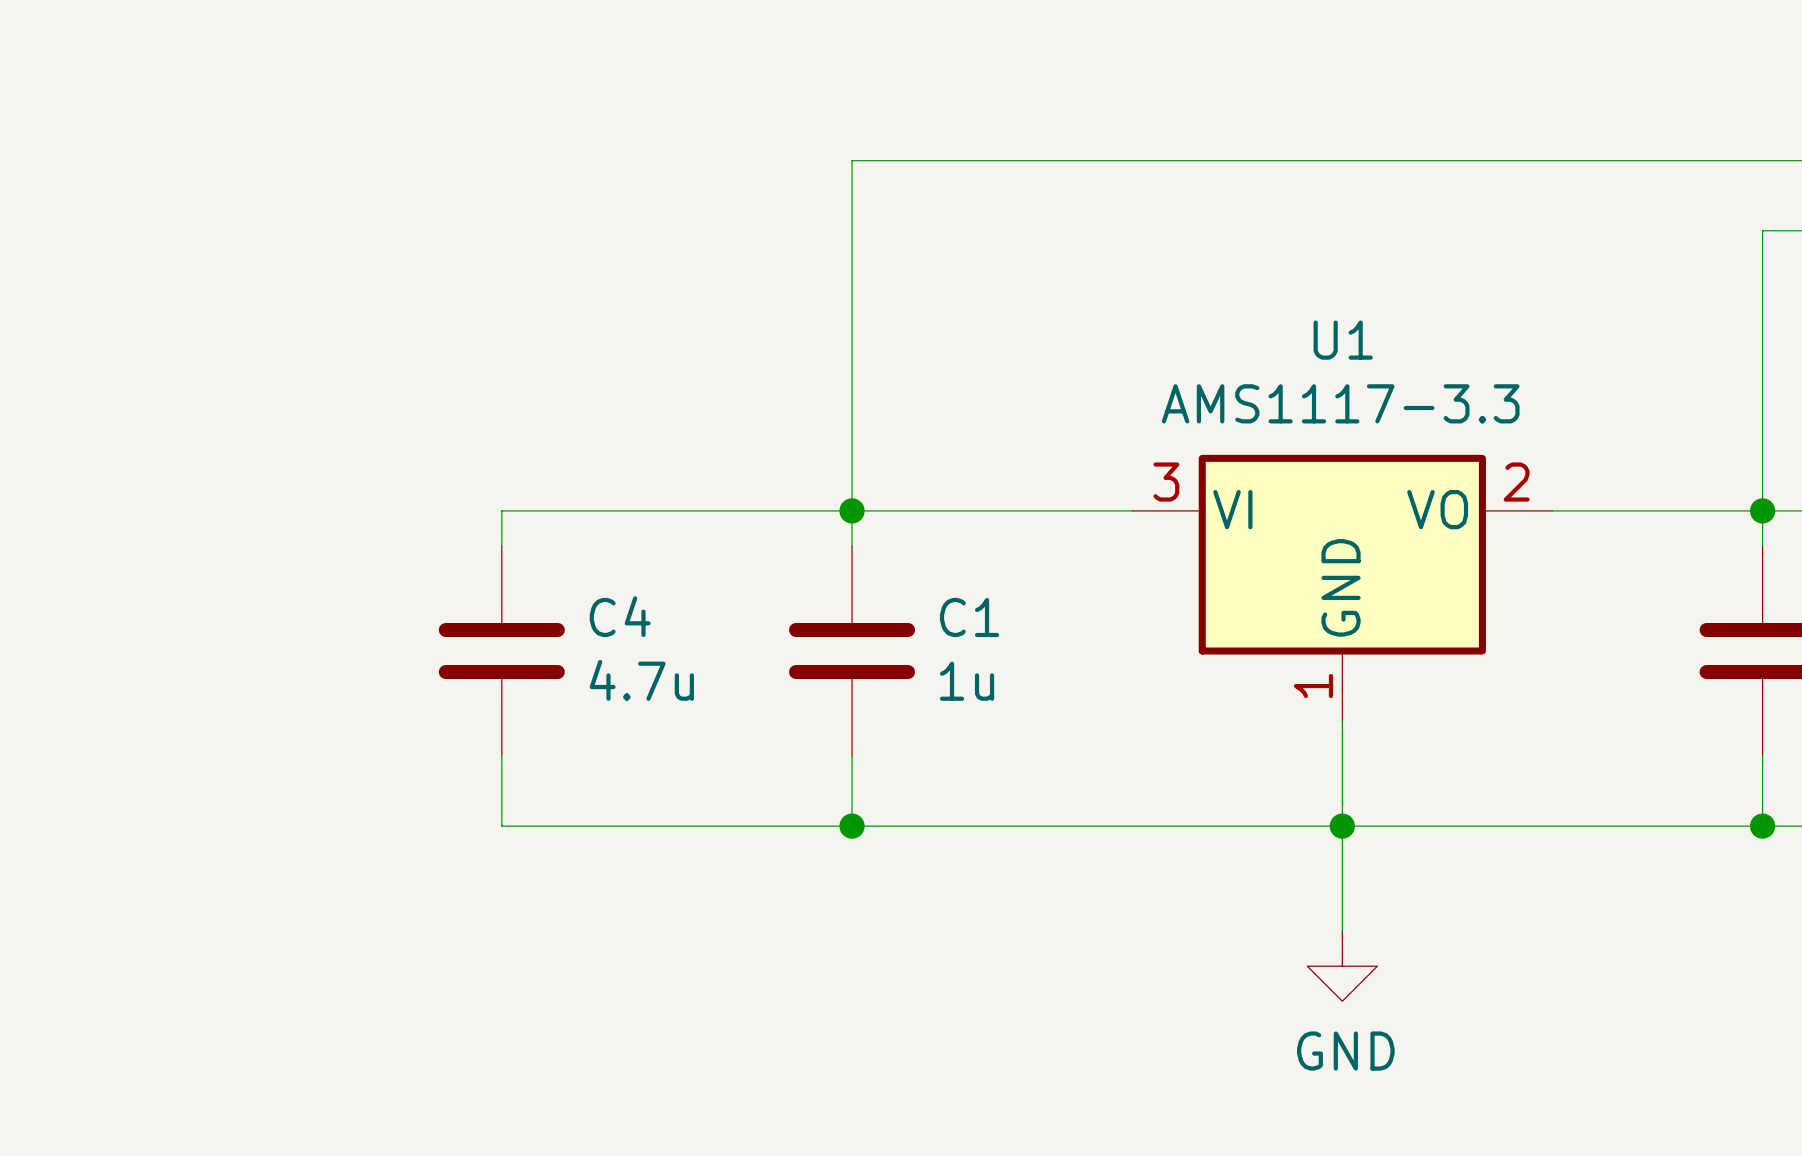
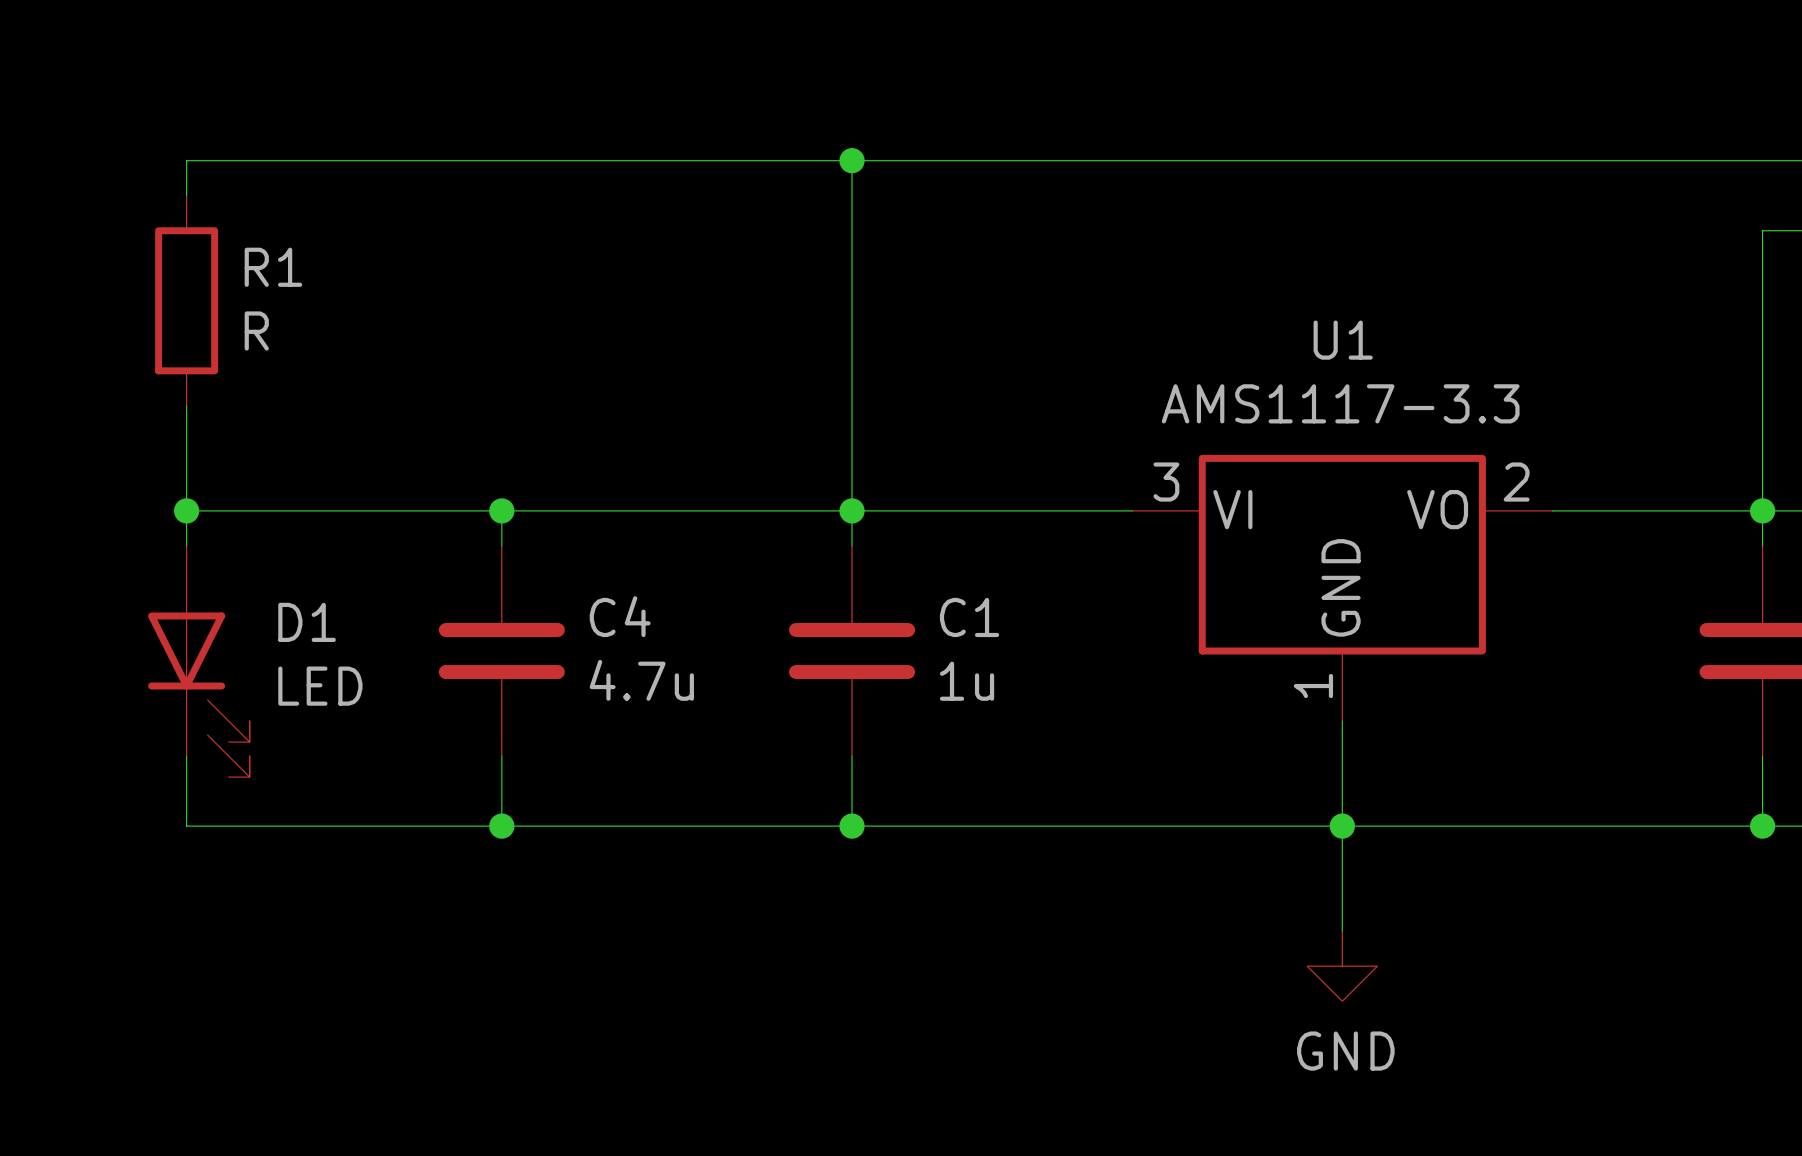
wire: none -> (852, 160) (186, 160) (186, 195)
junction: none -> (852, 160)
R1: none -> R (186, 300)
wire: none -> (186, 405) (186, 545)
wire: none -> (186, 510) (501, 510)
junction: none -> (186, 510)
junction: none -> (501, 510)
D1: none -> LED (198, 661)
wire: none -> (186, 756) (186, 826) (501, 826)
junction: none -> (501, 826)

